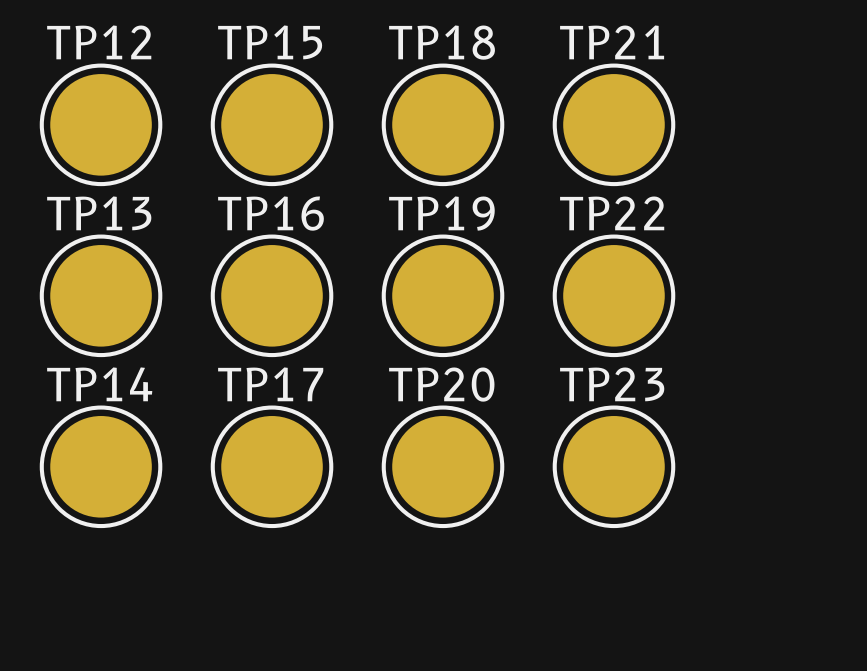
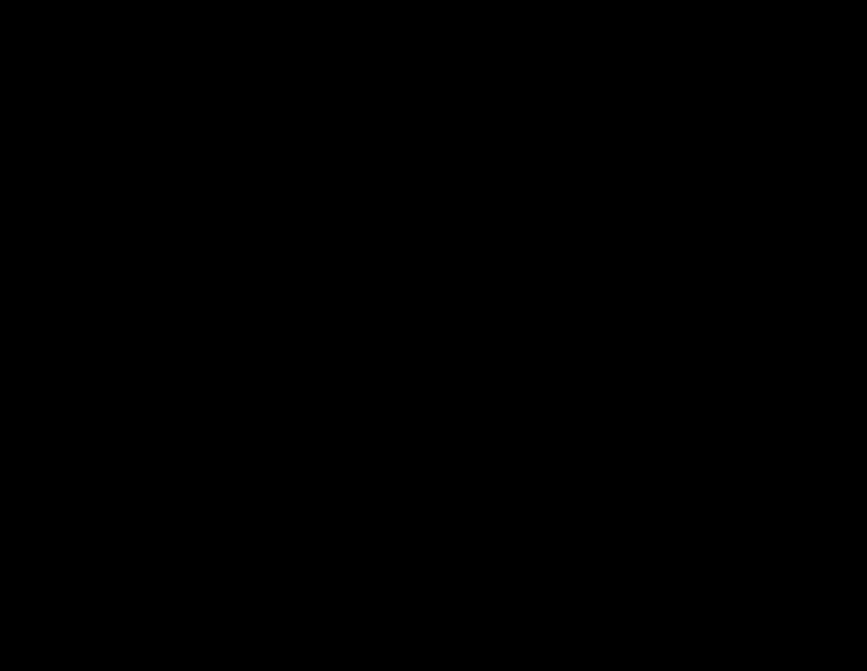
TP12: (101, 124) -> none
TP15: (272, 124) -> none
TP18: (443, 124) -> none
TP21: (613, 124) -> none
TP13: (101, 295) -> none
TP16: (272, 295) -> none
TP19: (443, 295) -> none
TP22: (613, 295) -> none
TP14: (101, 466) -> none
TP17: (272, 466) -> none
TP20: (443, 466) -> none
TP23: (613, 466) -> none

